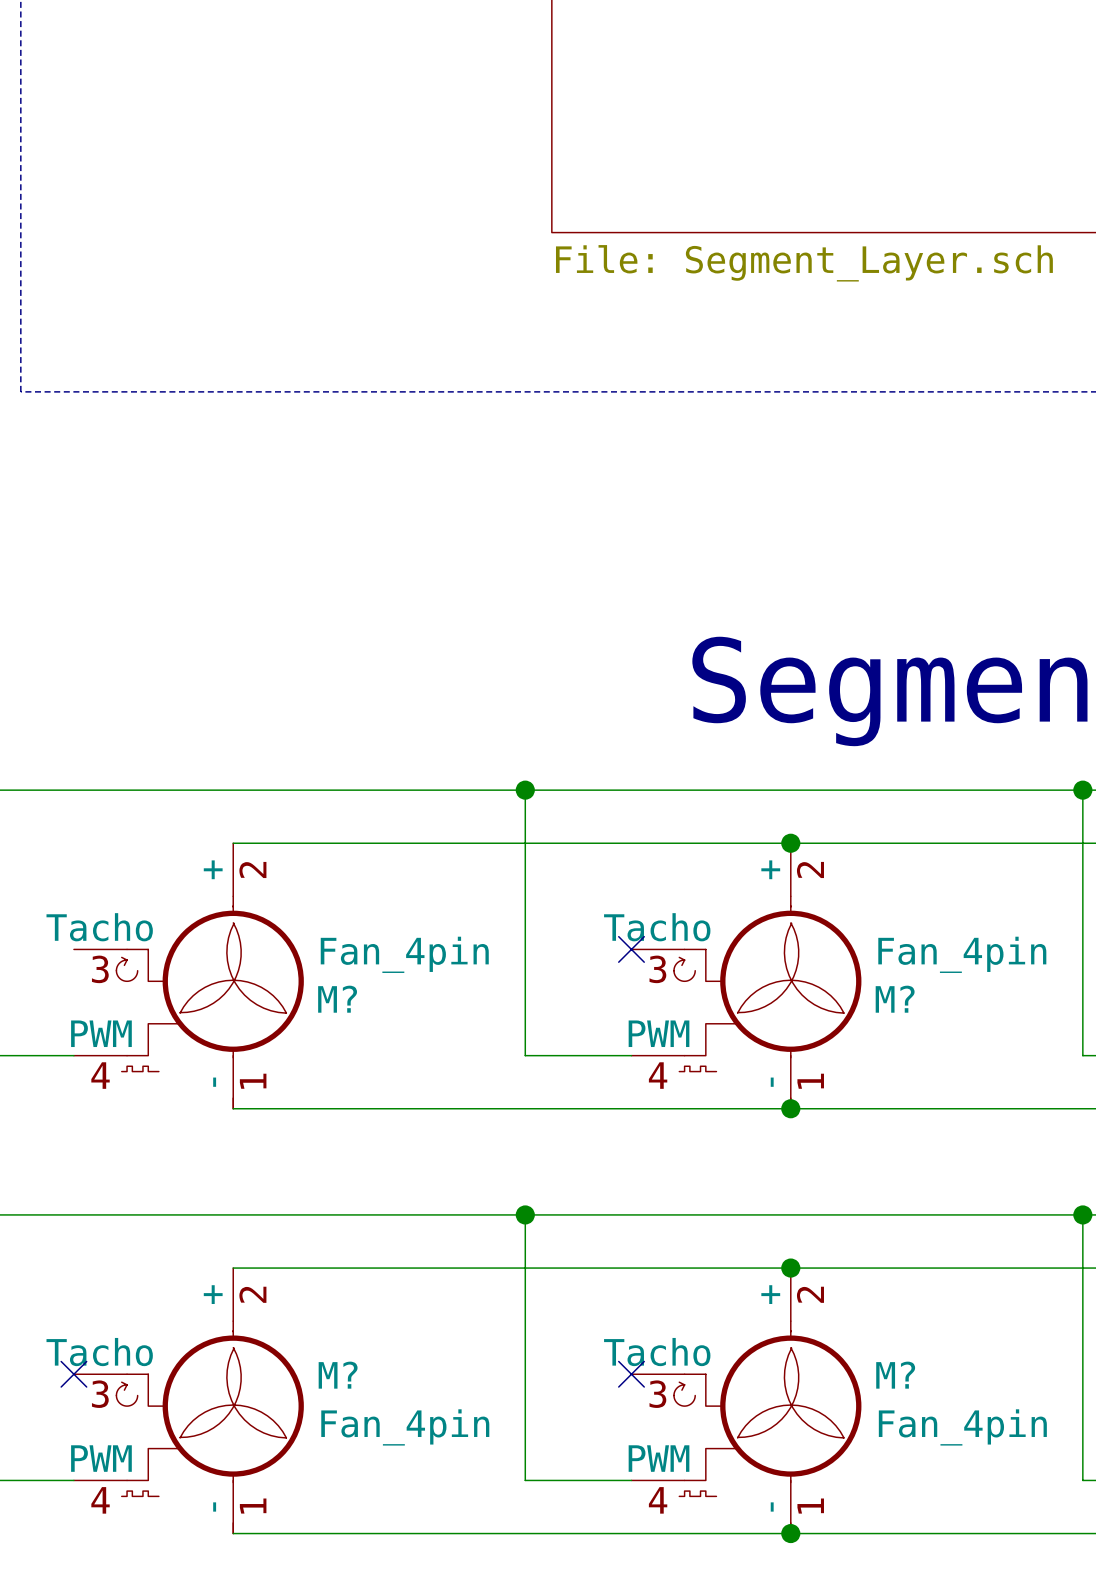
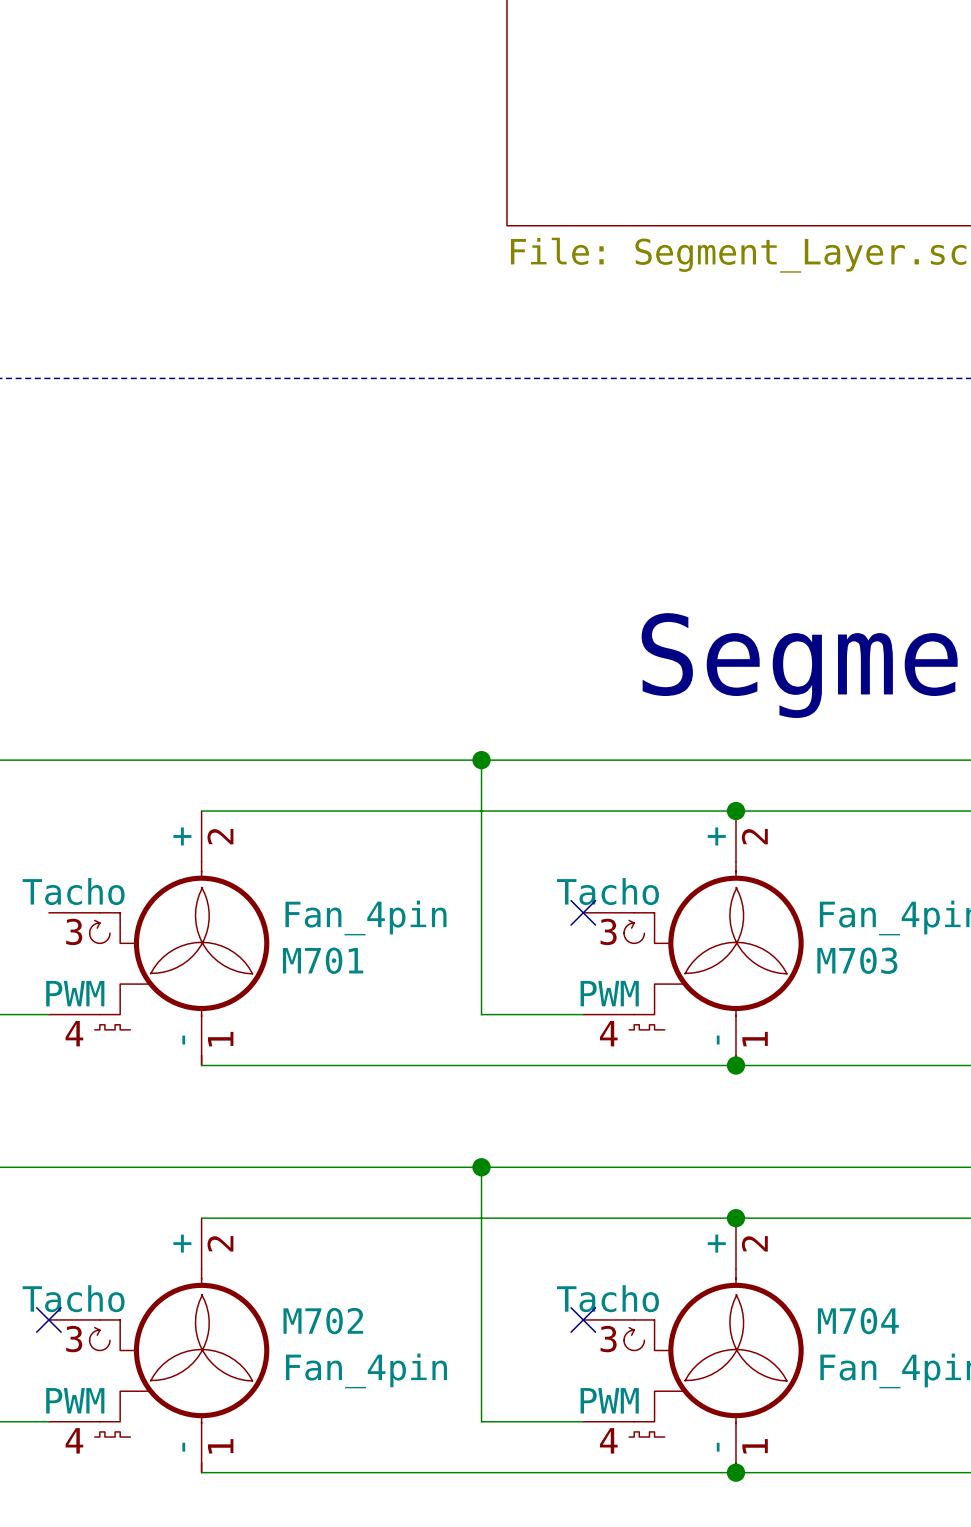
M? name: M? (337, 999) -> M701 (323, 960)
M? name: M? (895, 999) -> M703 (857, 960)
M? name: M? (338, 1375) -> M702 (323, 1321)
M? name: M? (895, 1375) -> M704 (858, 1321)

